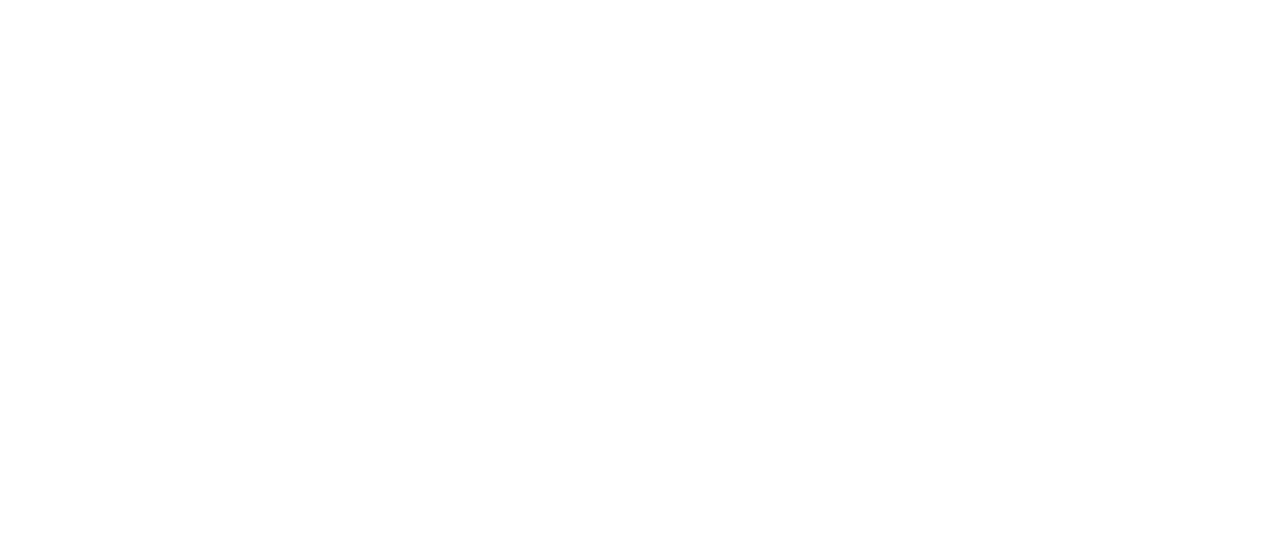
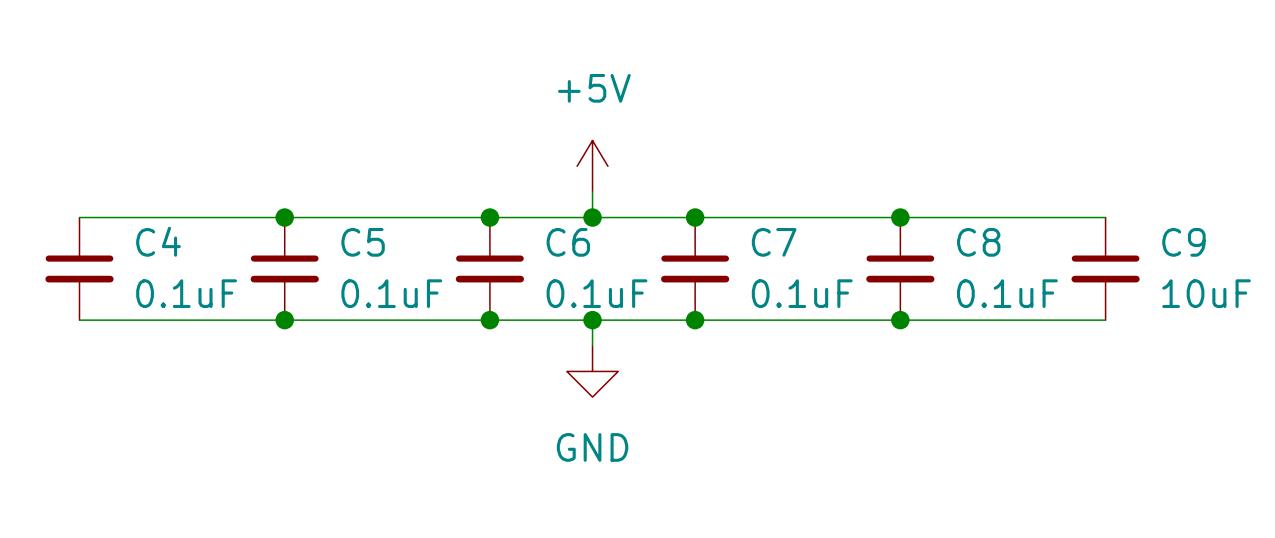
power symbol: none -> +5V (592, 166)
wire: none -> (592, 191) (592, 217)
wire: none -> (79, 217) (1105, 217)
junction: none -> (284, 217)
junction: none -> (489, 217)
junction: none -> (592, 217)
junction: none -> (695, 217)
junction: none -> (900, 217)
C4: none -> 0.1uF (79, 268)
C5: none -> 0.1uF (284, 268)
C6: none -> 0.1uF (489, 268)
C7: none -> 0.1uF (695, 268)
C8: none -> 0.1uF (900, 268)
C9: none -> 10uF (1105, 268)
wire: none -> (79, 320) (1105, 320)
junction: none -> (284, 320)
junction: none -> (489, 320)
wire: none -> (592, 320) (592, 345)
junction: none -> (592, 320)
junction: none -> (695, 320)
junction: none -> (900, 320)
power symbol: none -> GND (592, 371)

